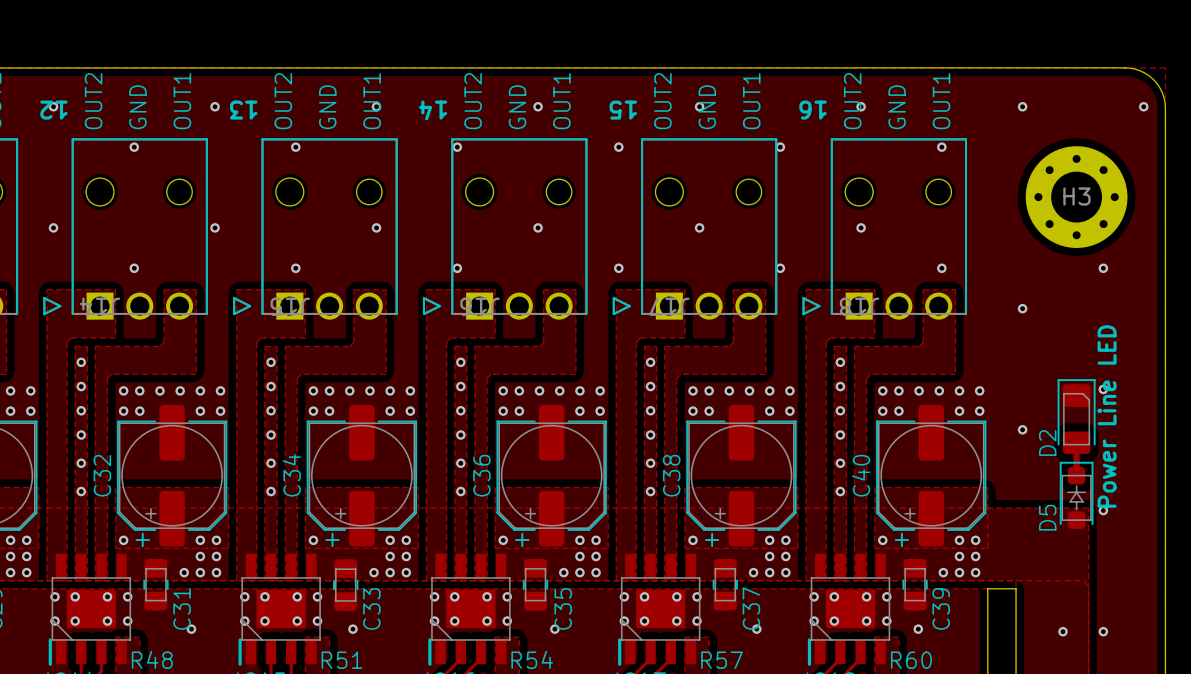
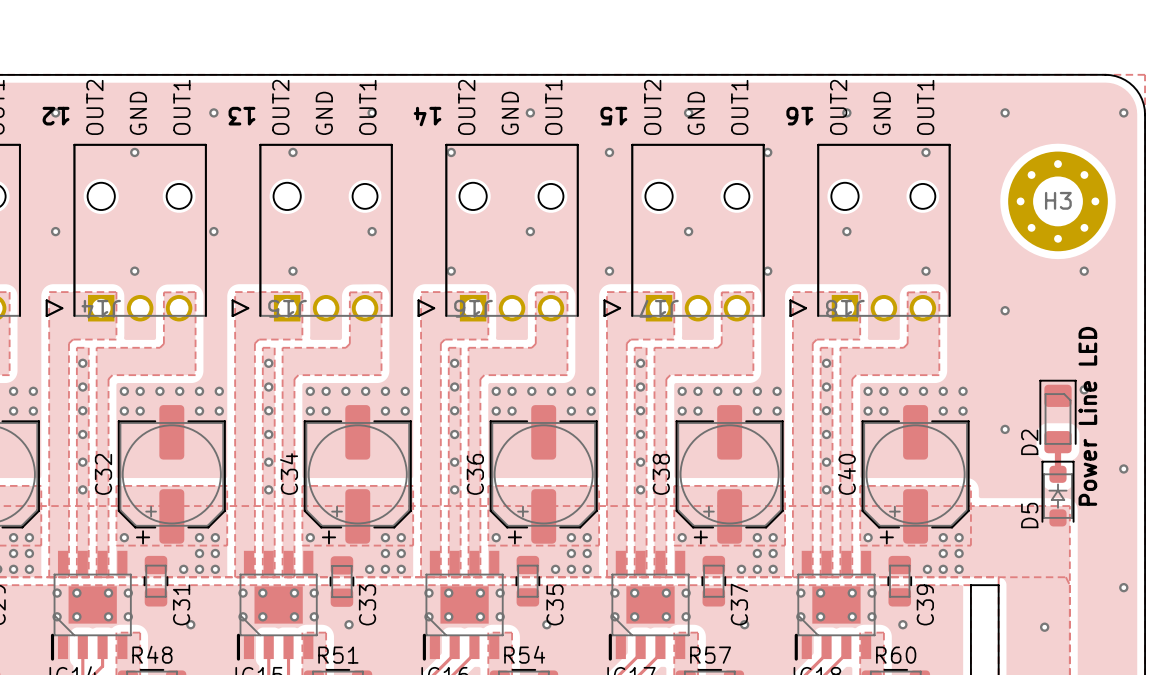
via: none -> (1123, 468)
via: (1103, 510) -> none
via: none -> (1123, 587)
via: (1103, 631) -> none

